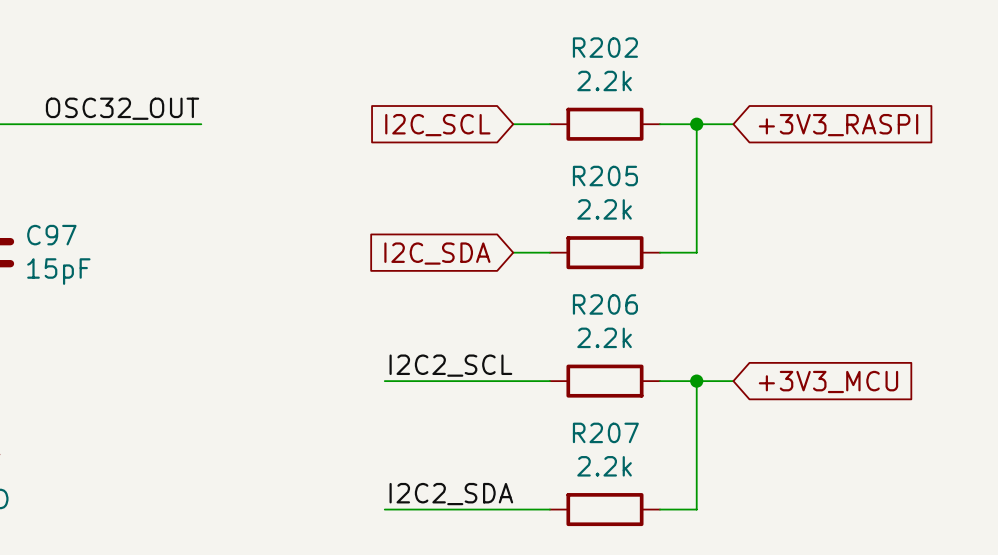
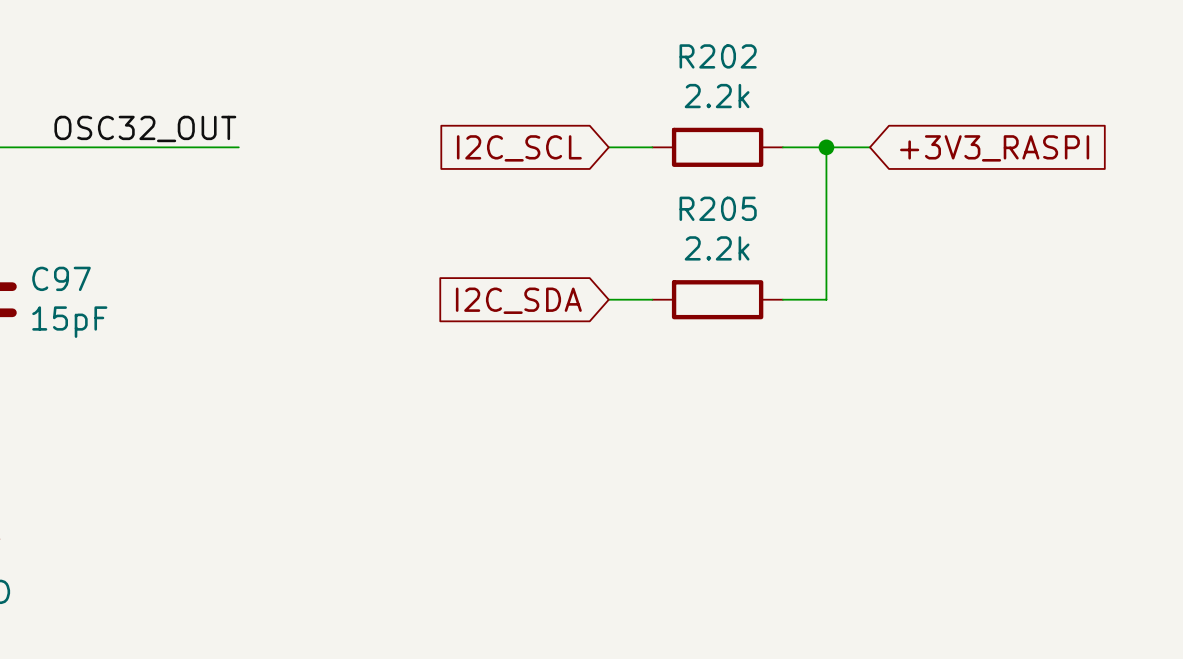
label: I2C2_SCL (450, 365) -> none
wire: (384, 381) (549, 381) -> none
R206: 2.2k (604, 381) -> none
wire: (660, 381) (733, 381) -> none
wire: (696, 381) (696, 509) (660, 509) -> none
junction: (696, 381) -> none
global label: +3V3_MCU (828, 381) -> none
label: I2C2_SDA (451, 494) -> none
wire: (384, 509) (549, 509) -> none
R207: 2.2k (604, 509) -> none

